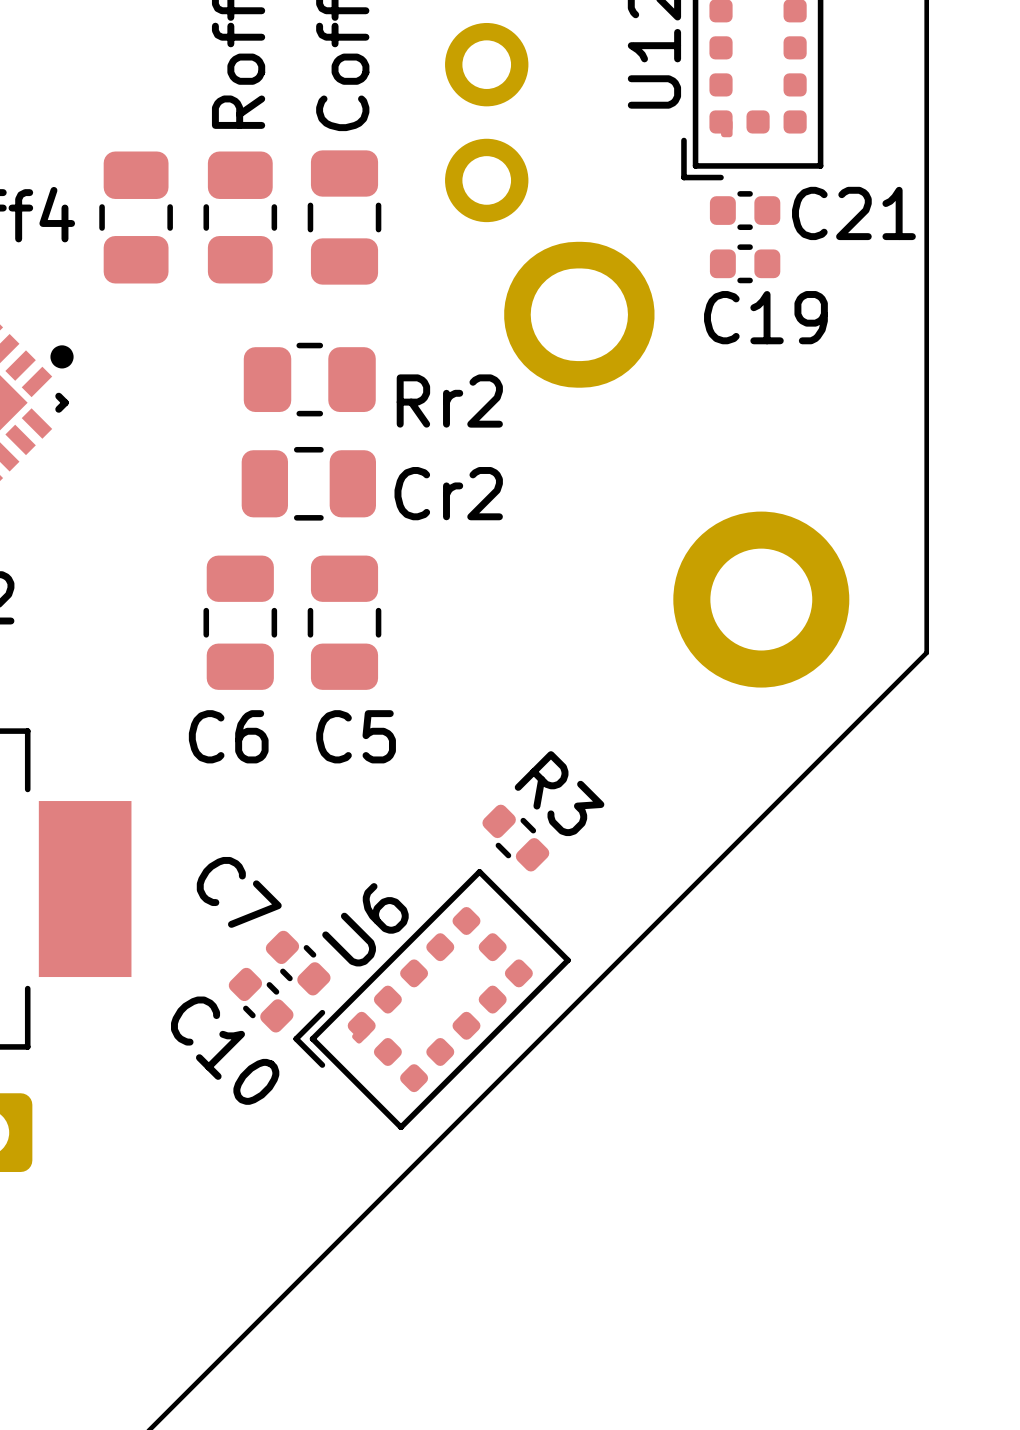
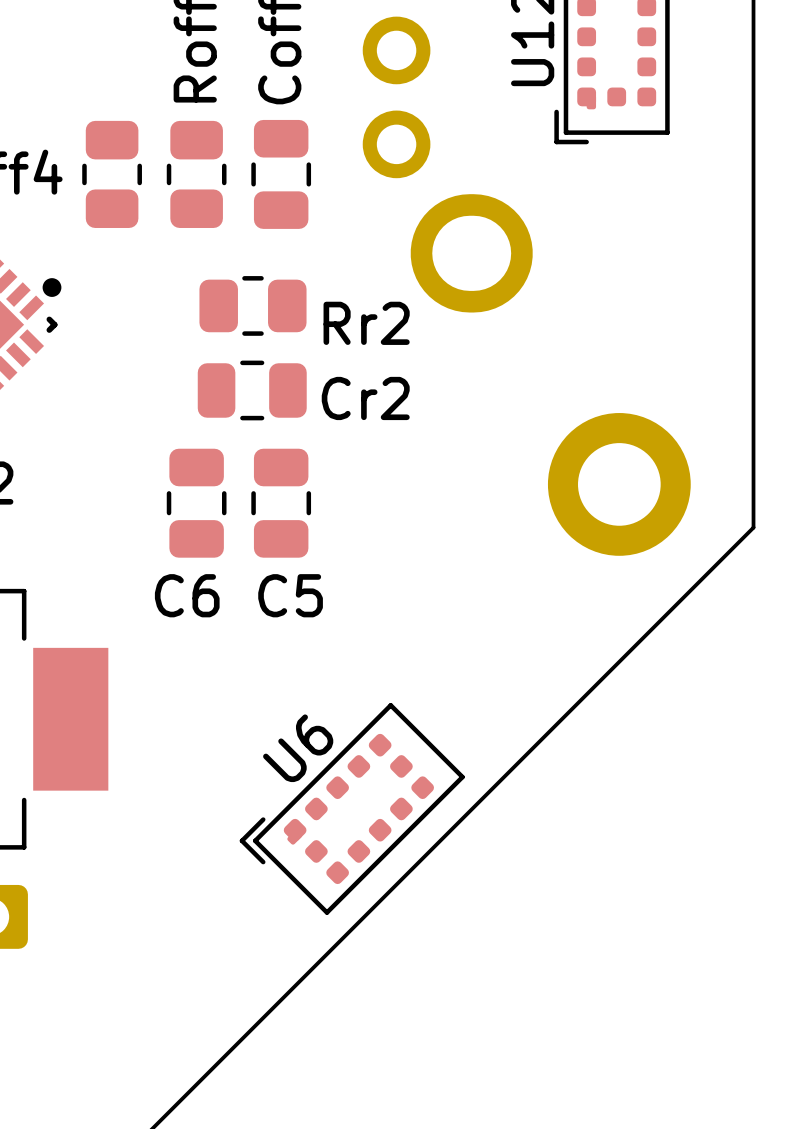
C21: (745, 210) -> none
C19: (745, 263) -> none
R3: (515, 838) -> none
C7: (298, 963) -> none
C10: (261, 1000) -> none

